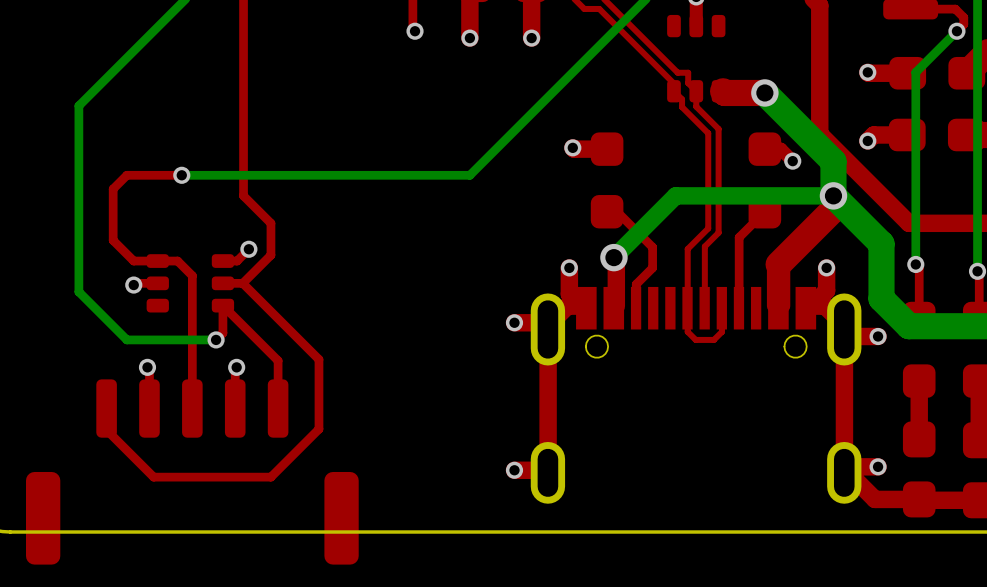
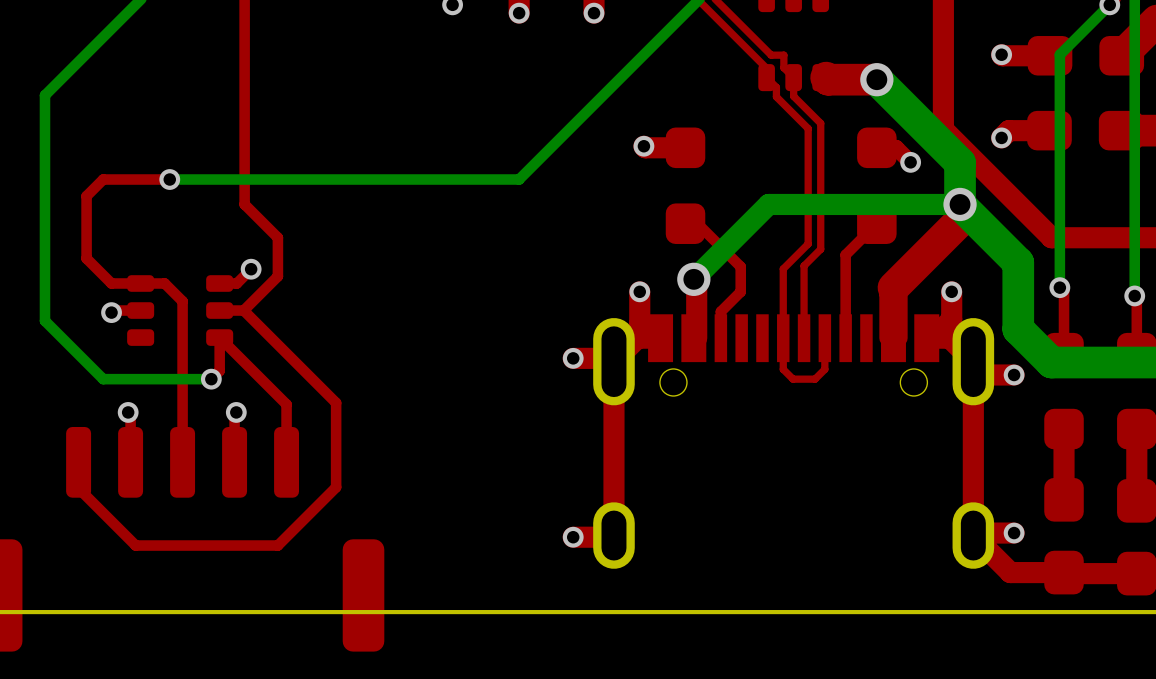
part footprint: [530, 286, 862, 504] -> [593, 314, 995, 569]

